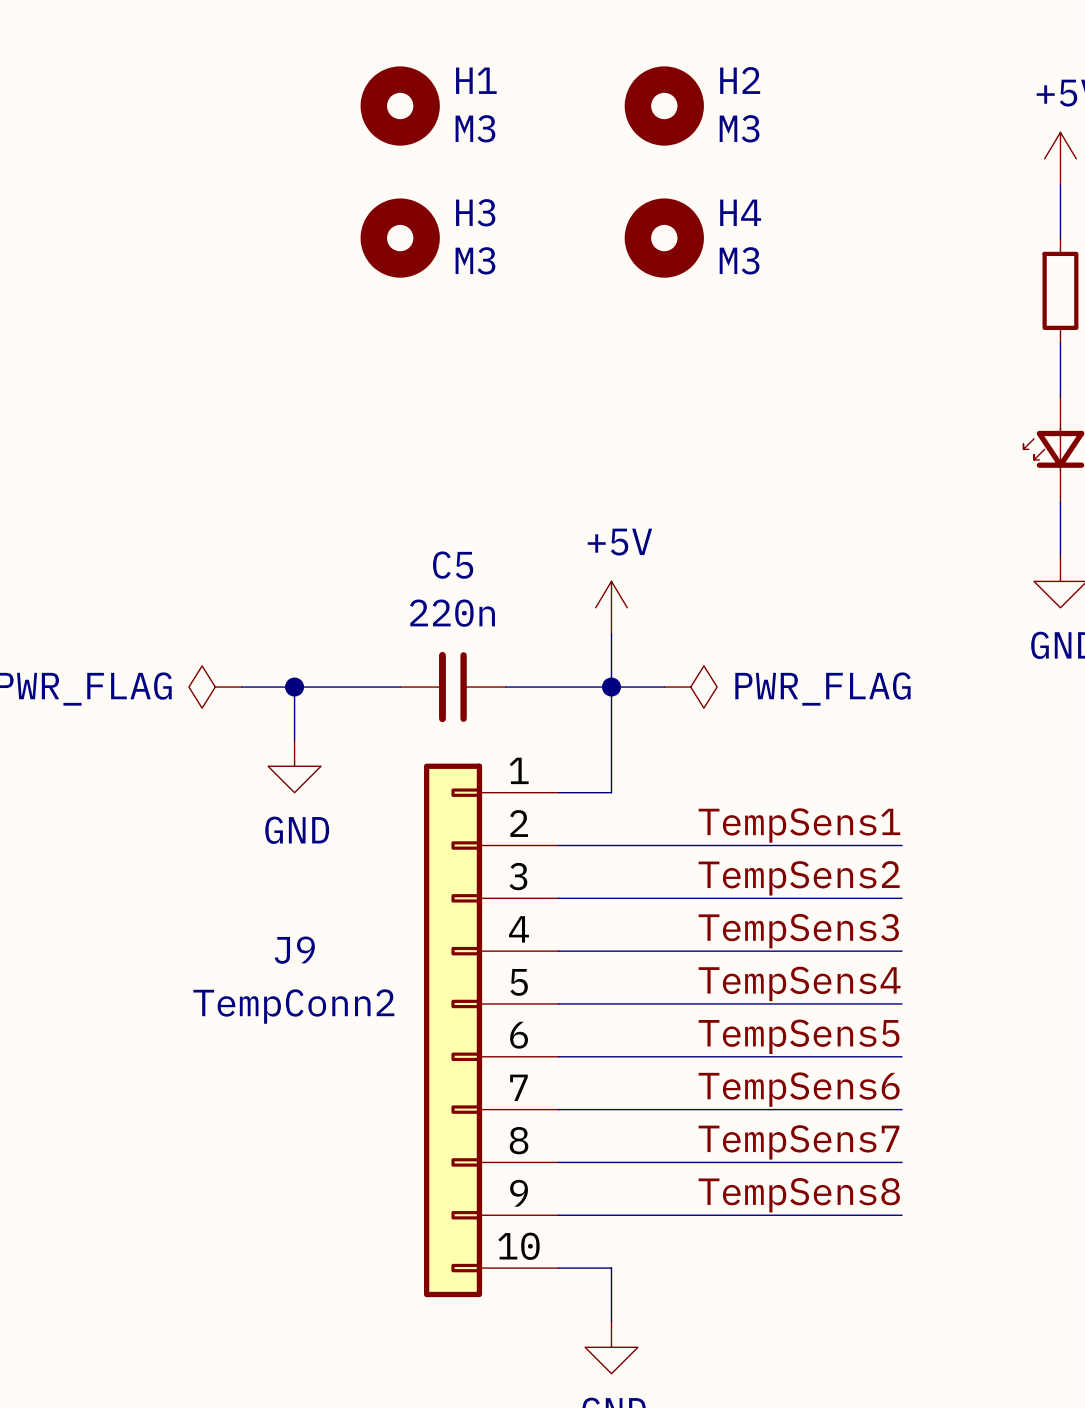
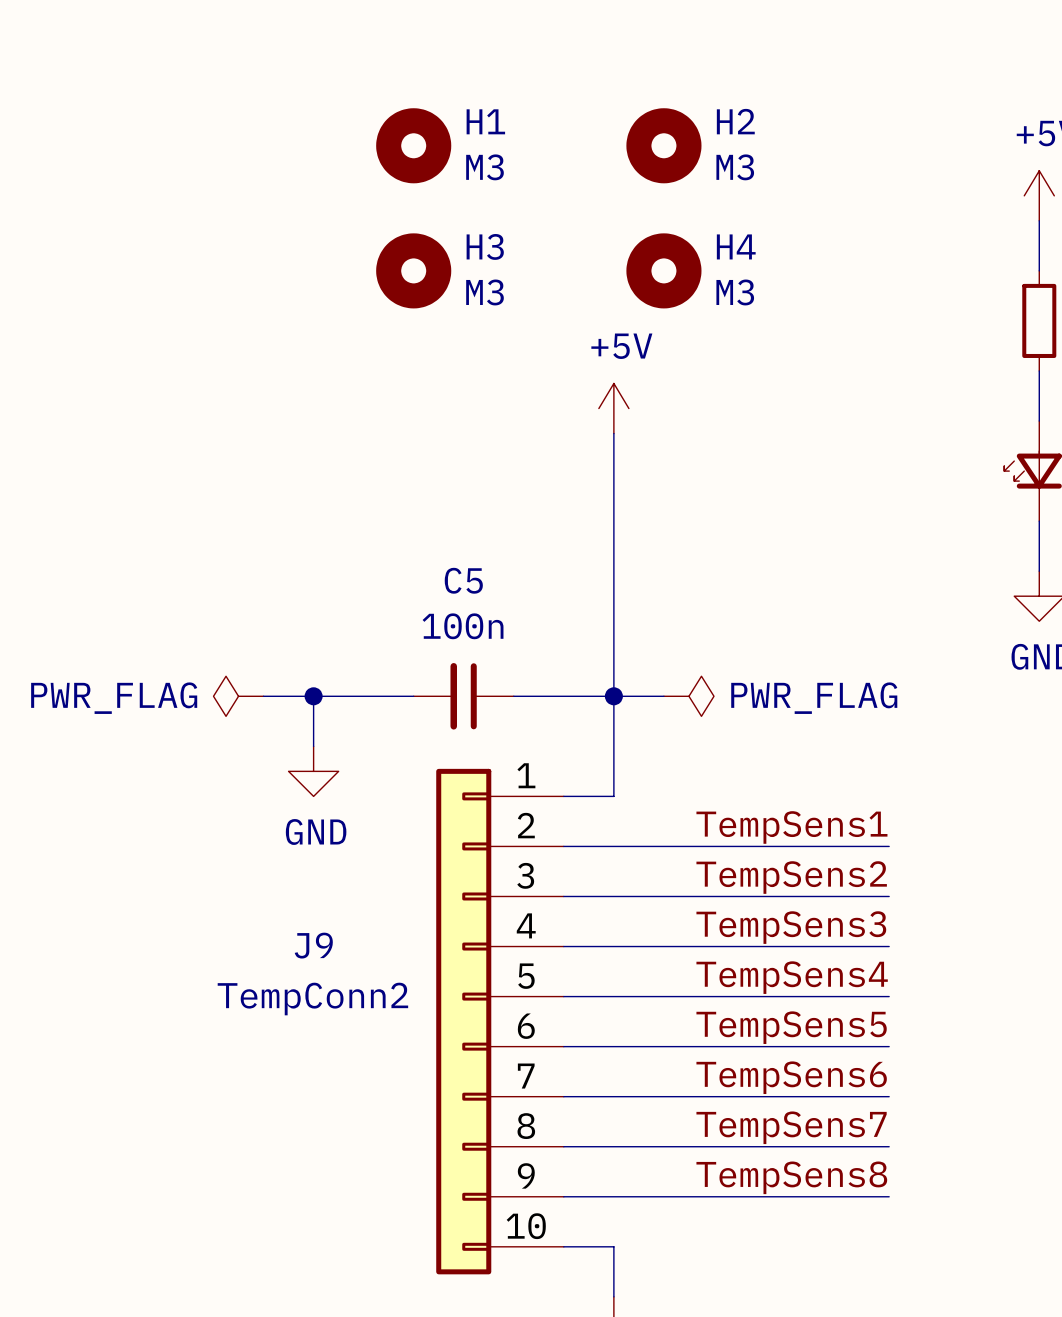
wire: none -> (613, 433) (613, 646)
power symbol position: +5V (611, 607) -> +5V (613, 408)
C5 value: 220n (452, 613) -> 100n (463, 626)

